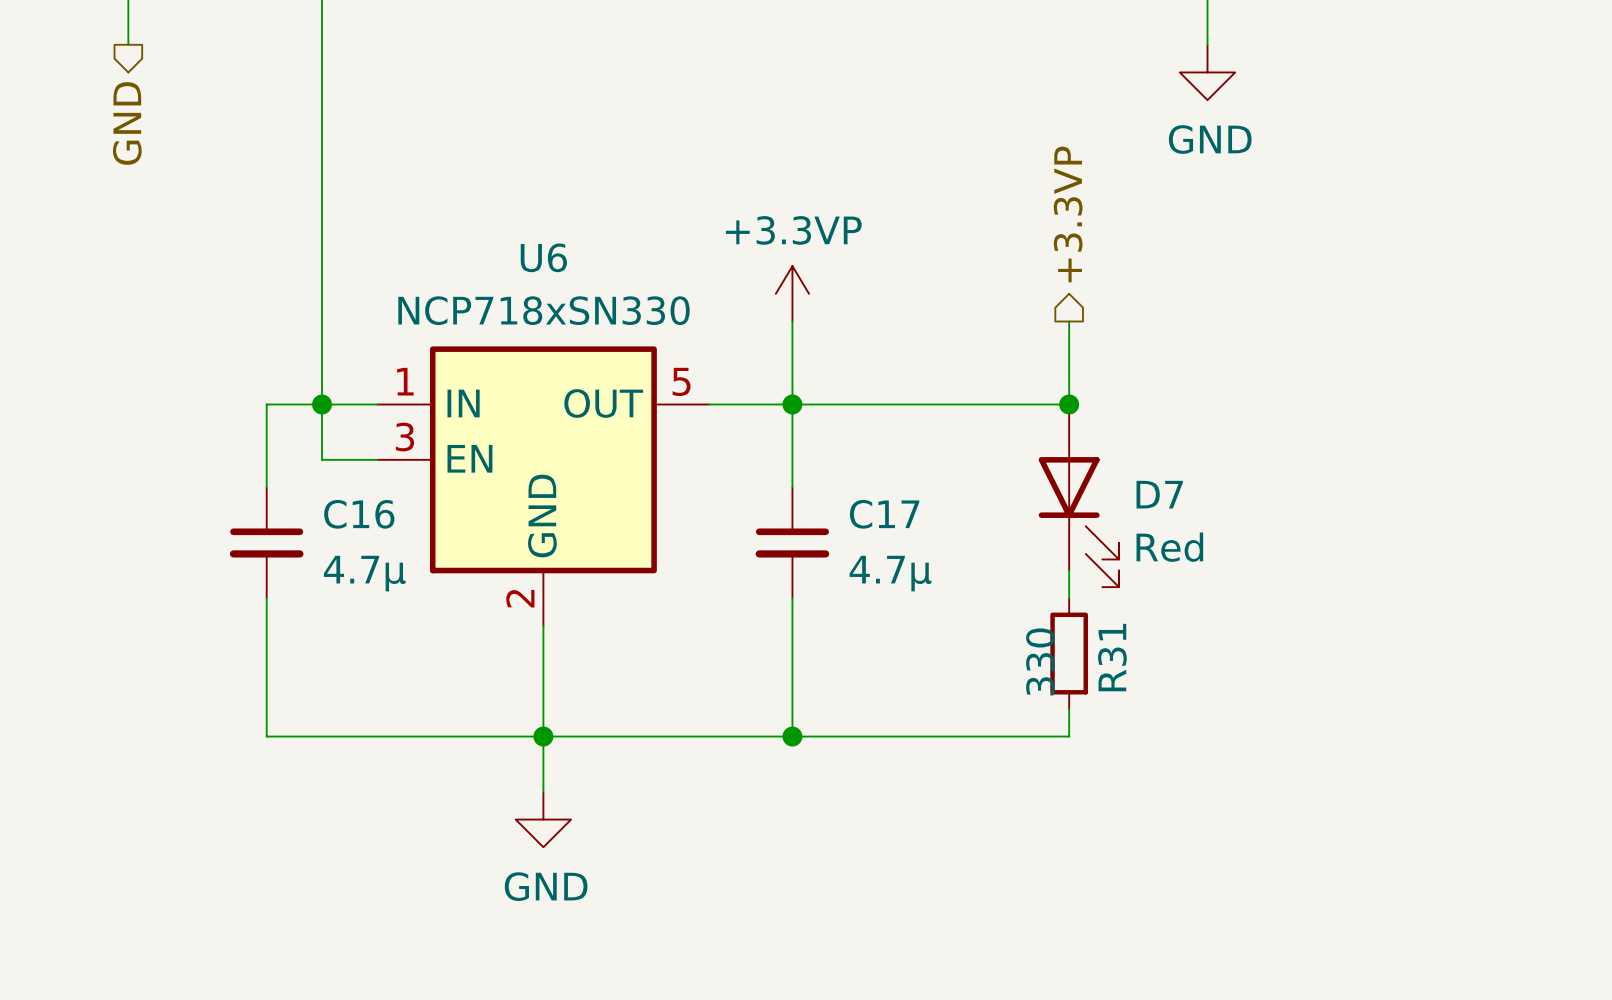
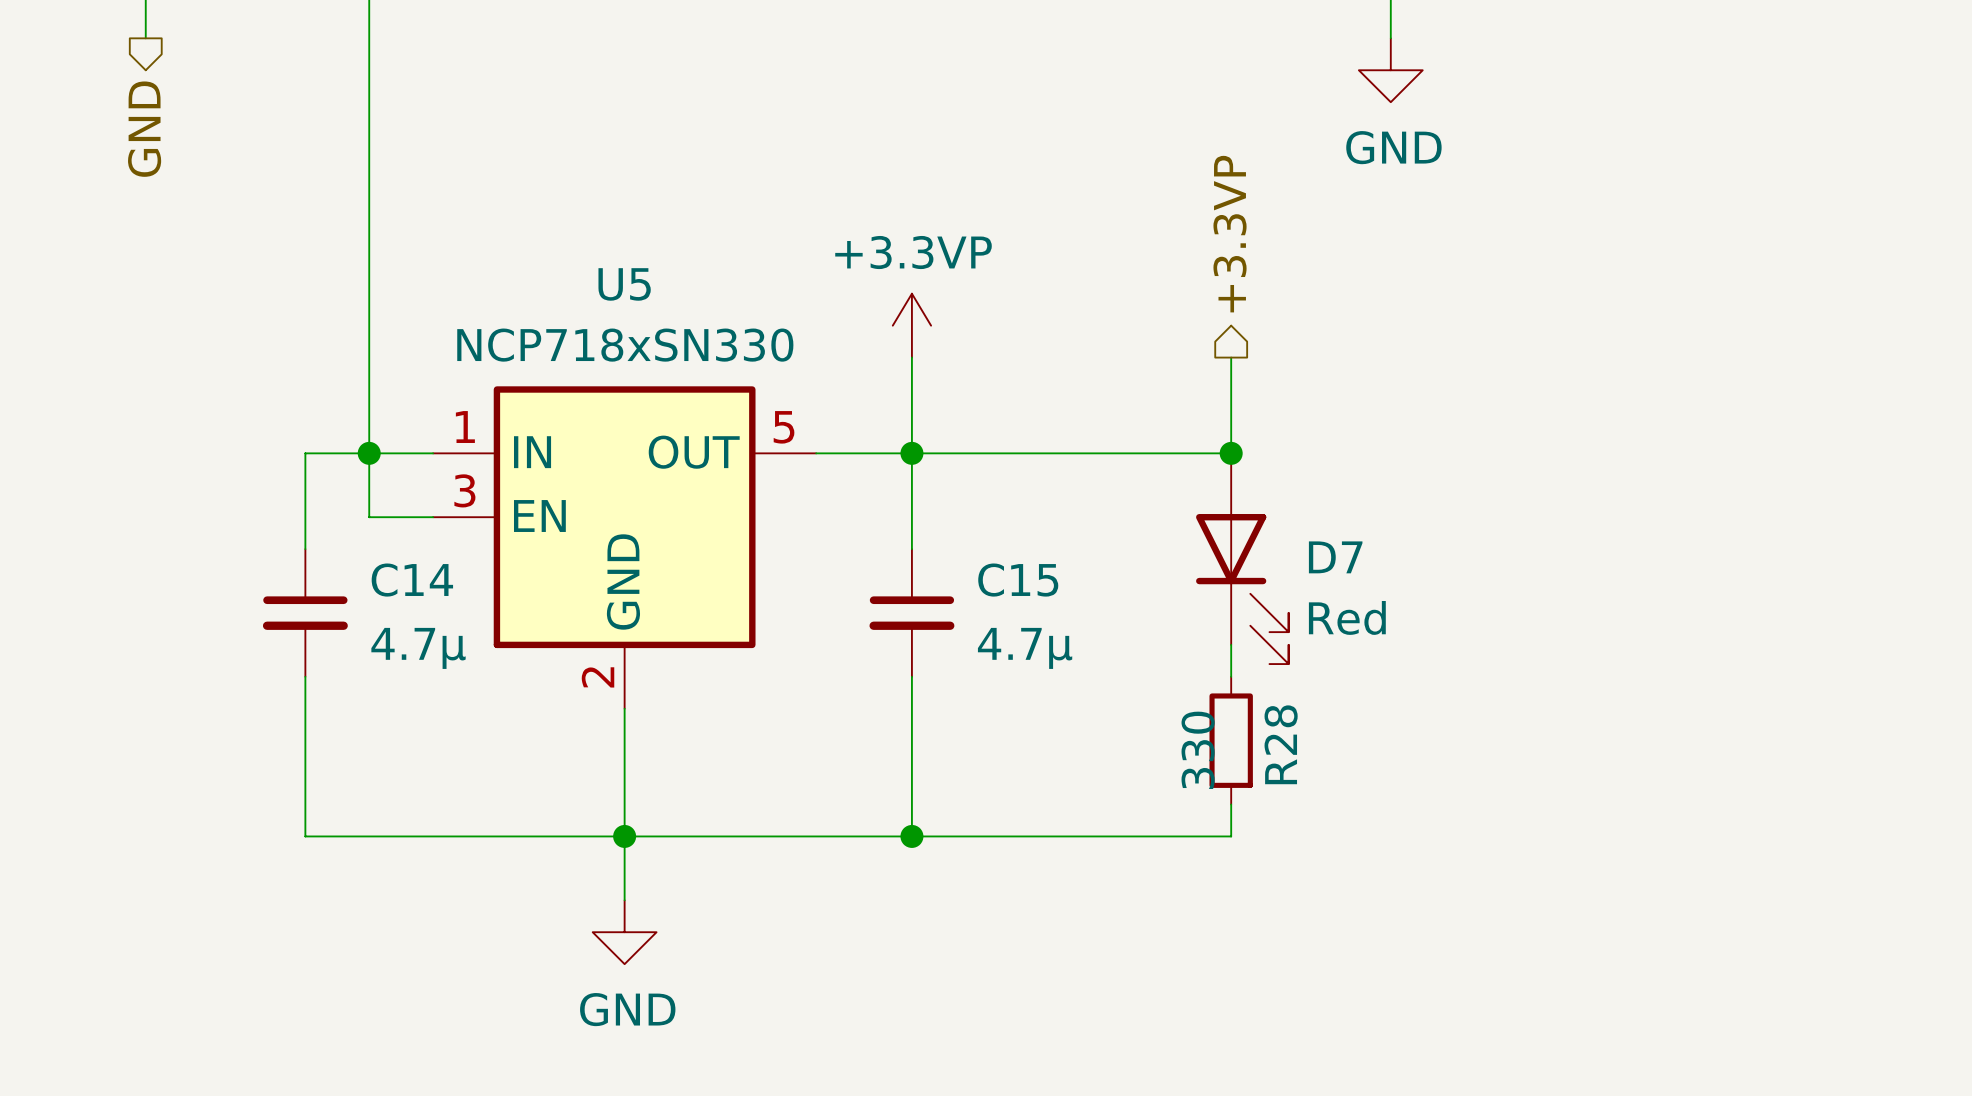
U6 name: U6 (543, 257) -> U5 (624, 284)
C16 name: C16 (359, 514) -> C14 (412, 580)
C17 name: C17 (884, 514) -> C15 (1018, 580)
R31 name: R31 (1112, 657) -> R28 (1281, 744)

